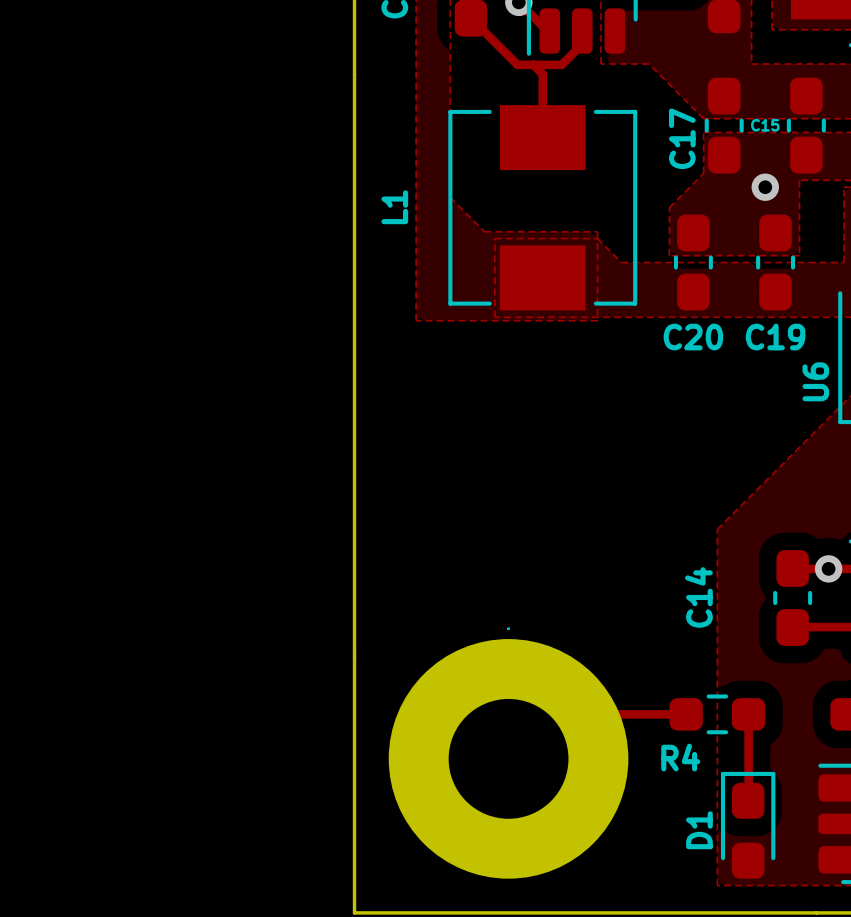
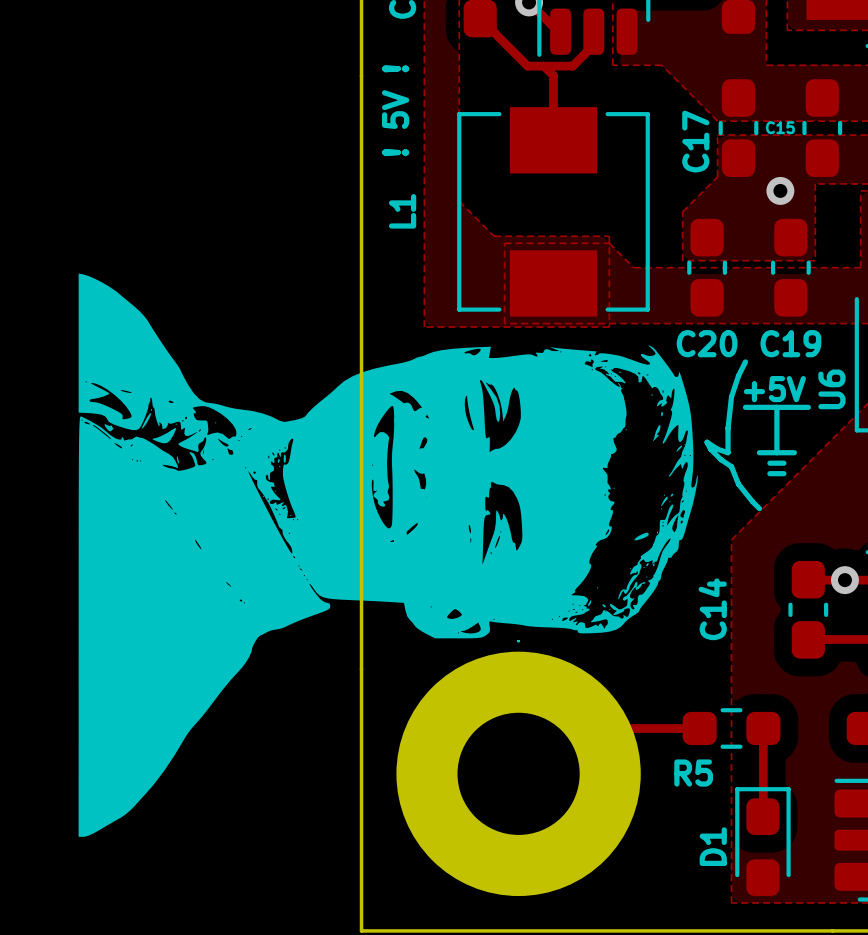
text: none -> ! 5V ! (395, 110)
line: none -> (745, 361) (731, 396) (728, 428) (728, 452) (717, 449) (707, 442) (710, 449) (731, 466) (738, 484) (759, 508)
text: none -> +5V (774, 389)
line: none -> (745, 407) (808, 407)
line: none -> (776, 407) (776, 452)
line: none -> (759, 452) (794, 452)
line: none -> (769, 463) (783, 463)
line: none -> (769, 473) (783, 473)
part: none -> (388, 555)
R4 name: R4 (680, 757) -> R5 (693, 773)

